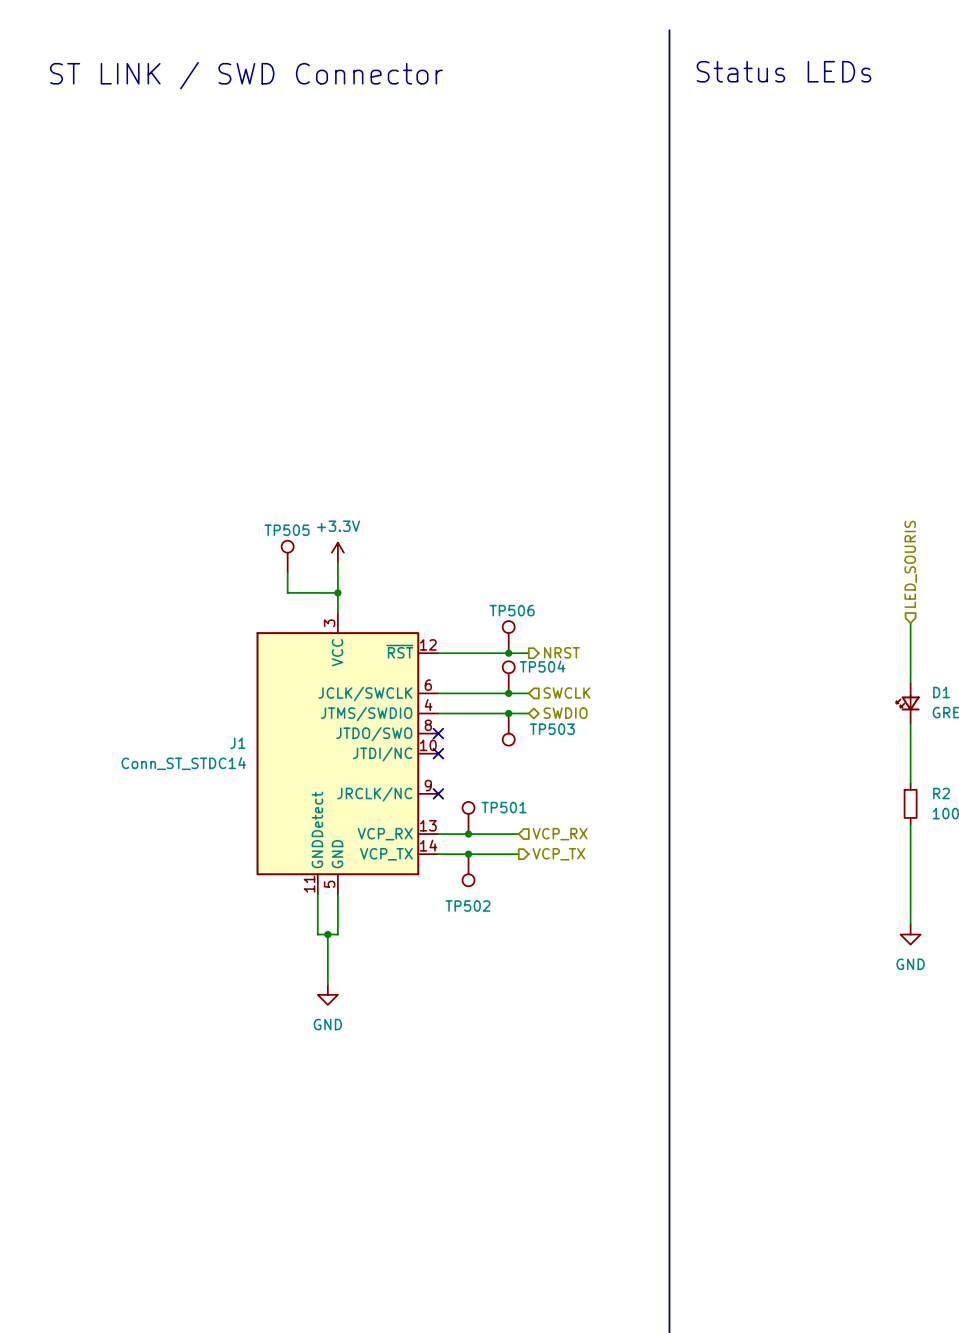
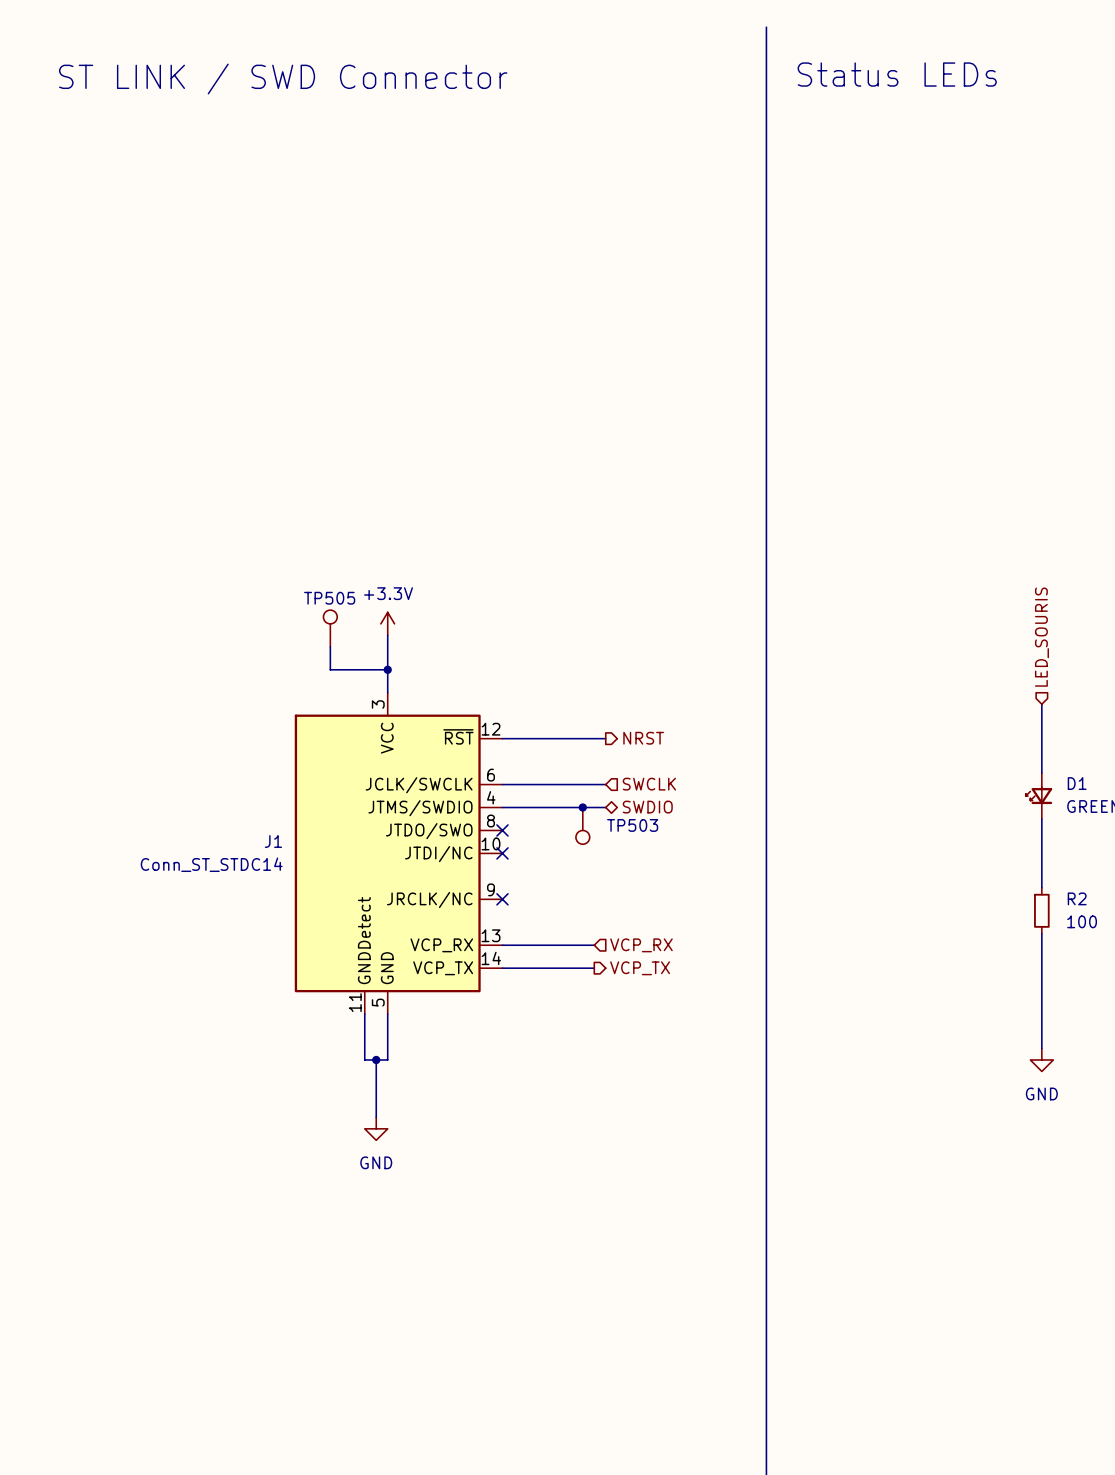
TP506: (508, 637) -> none
junction: (508, 653) -> none
TP504: (508, 677) -> none
junction: (508, 693) -> none
TP501: (468, 817) -> none
junction: (468, 834) -> none
junction: (468, 854) -> none
TP502: (468, 870) -> none

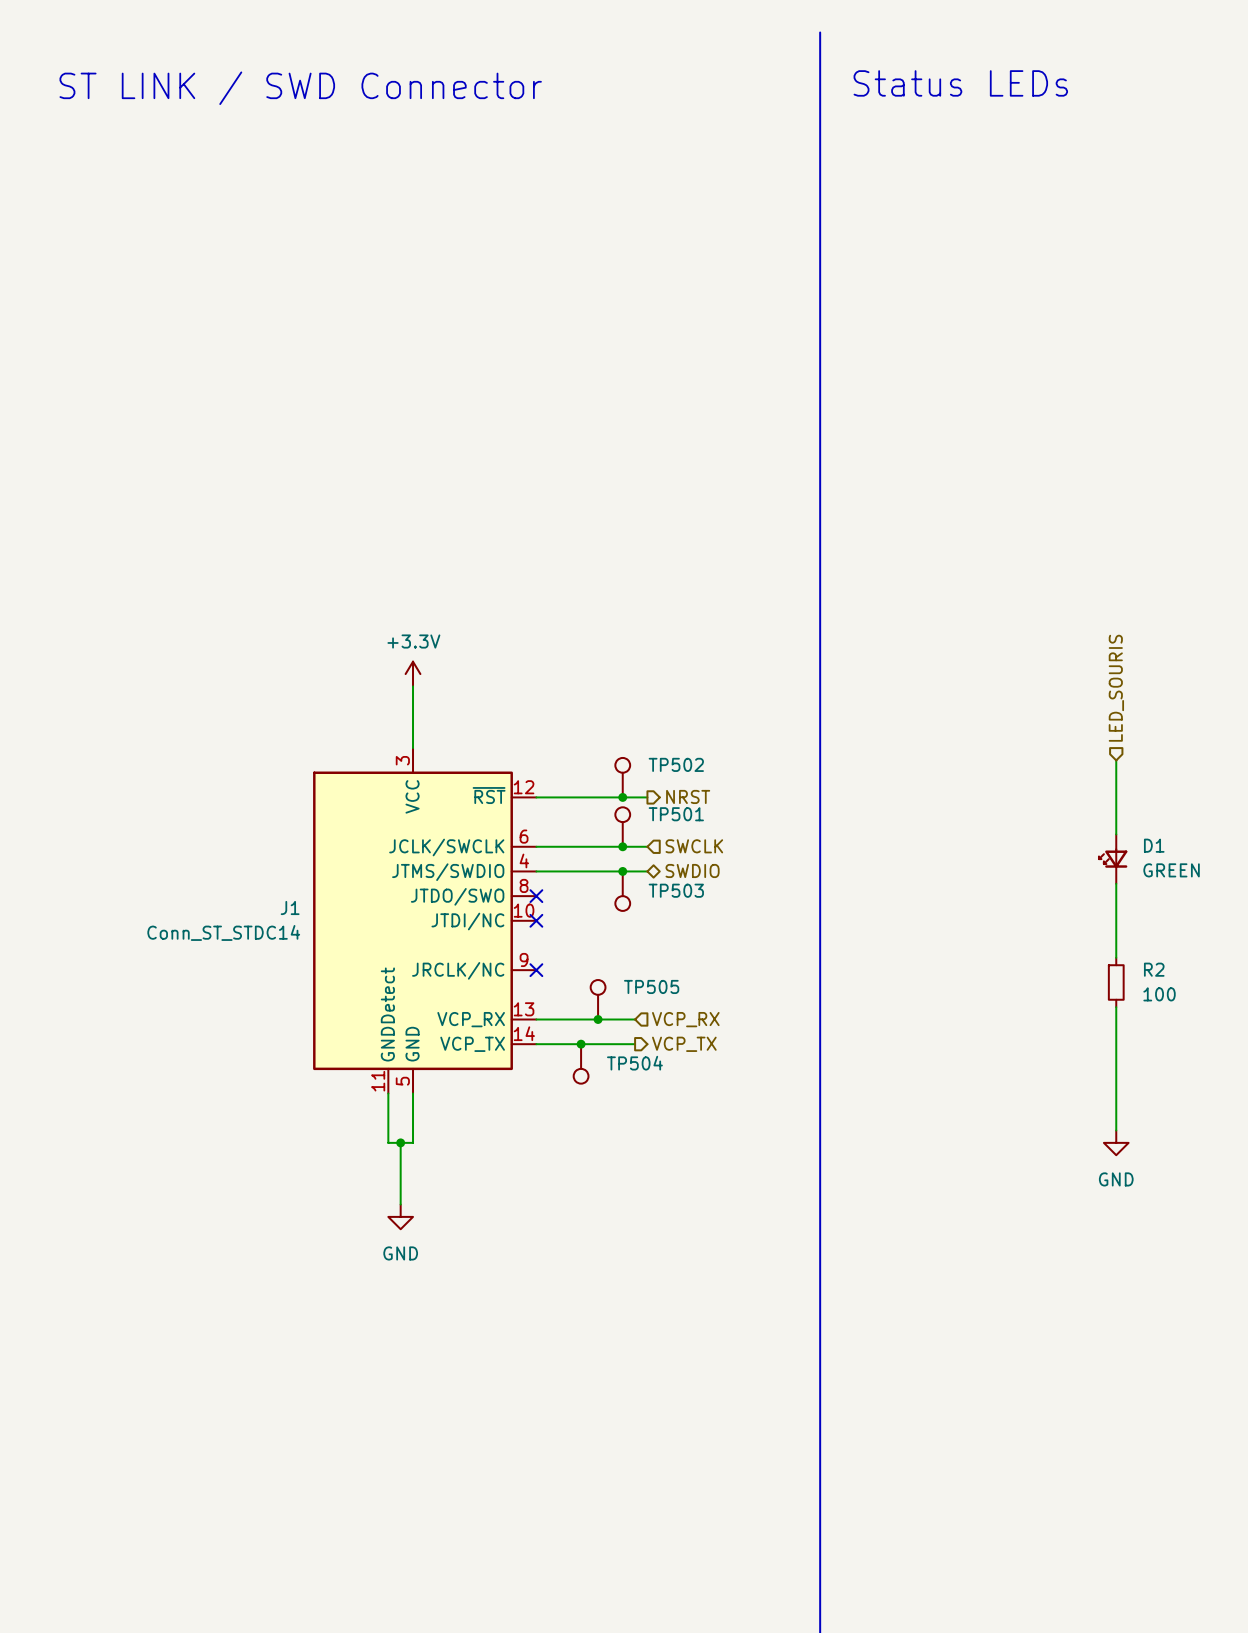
TP505 name position: TP505 (329, 598) -> TP505 (651, 986)
TP505 position: (330, 628) -> (598, 999)
wire: (330, 646) (330, 669) (387, 669) -> none
junction: (387, 669) -> none
TP502: none -> (622, 777)
junction: none -> (622, 797)
TP501: none -> (622, 827)
junction: none -> (622, 846)
junction: none -> (598, 1019)
junction: none -> (581, 1044)
TP504: none -> (581, 1063)

